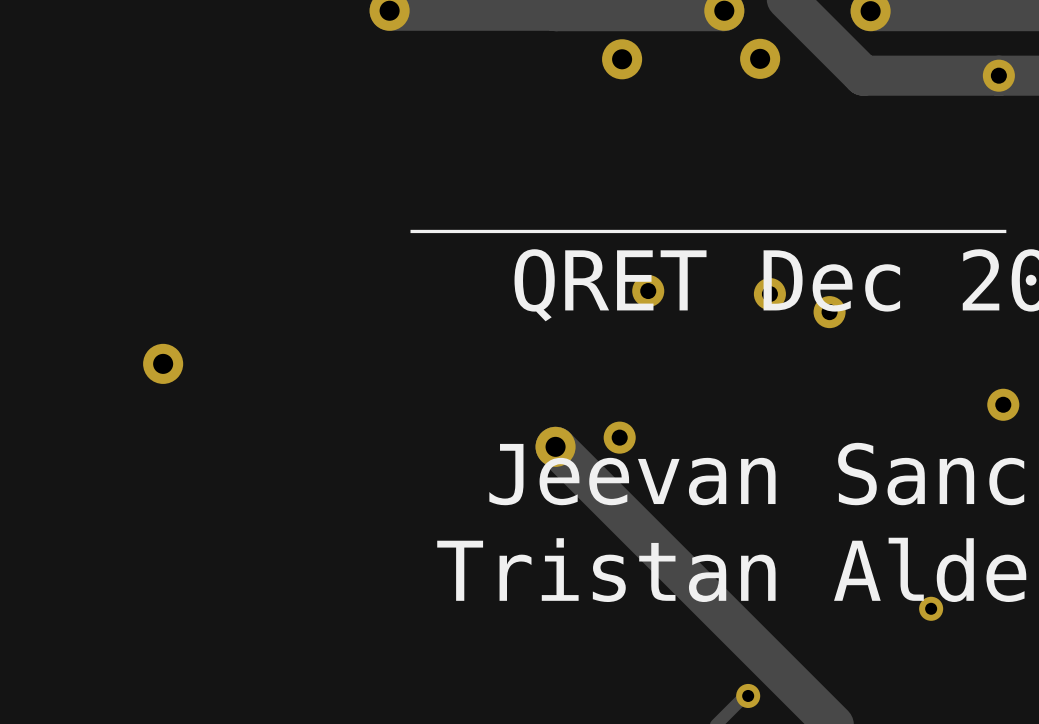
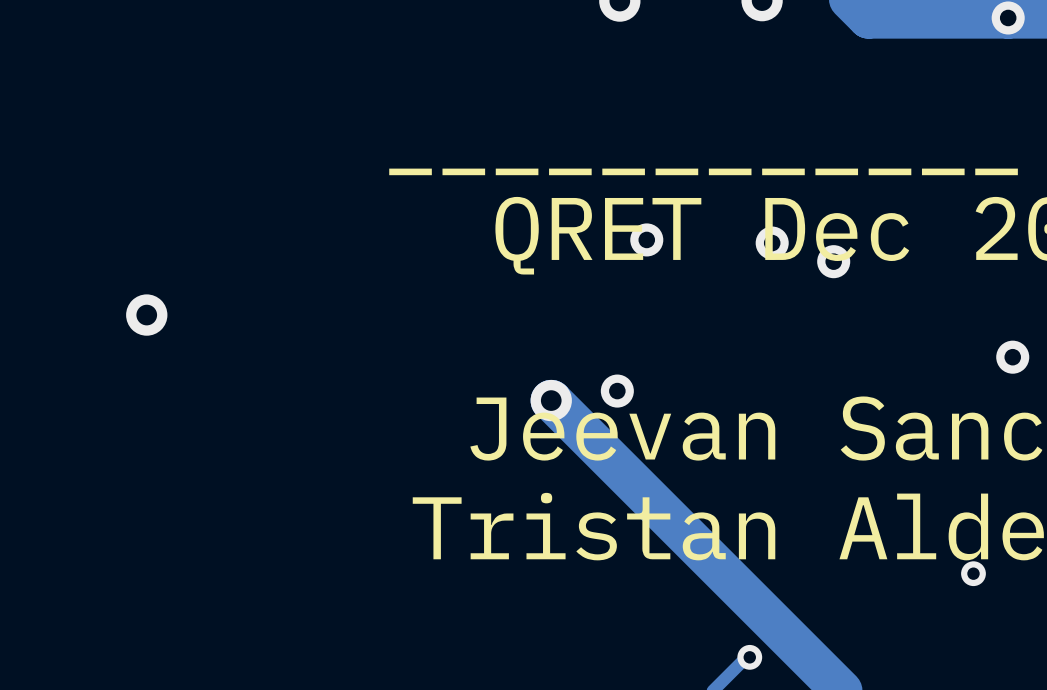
via position: (931, 608) -> (973, 573)

